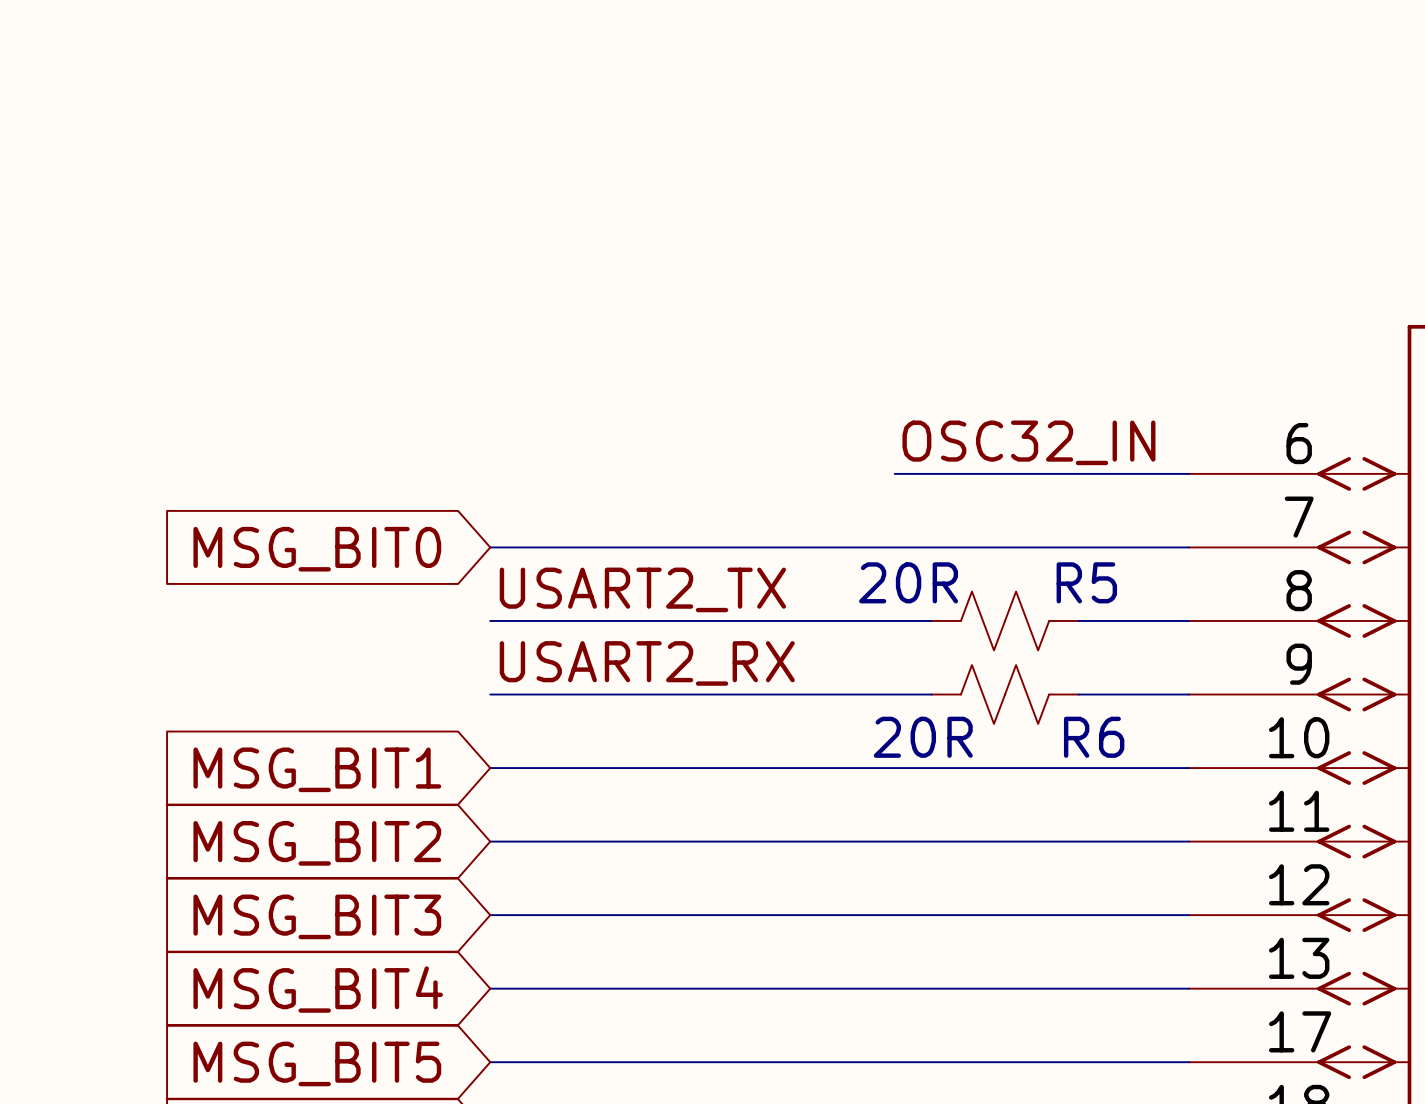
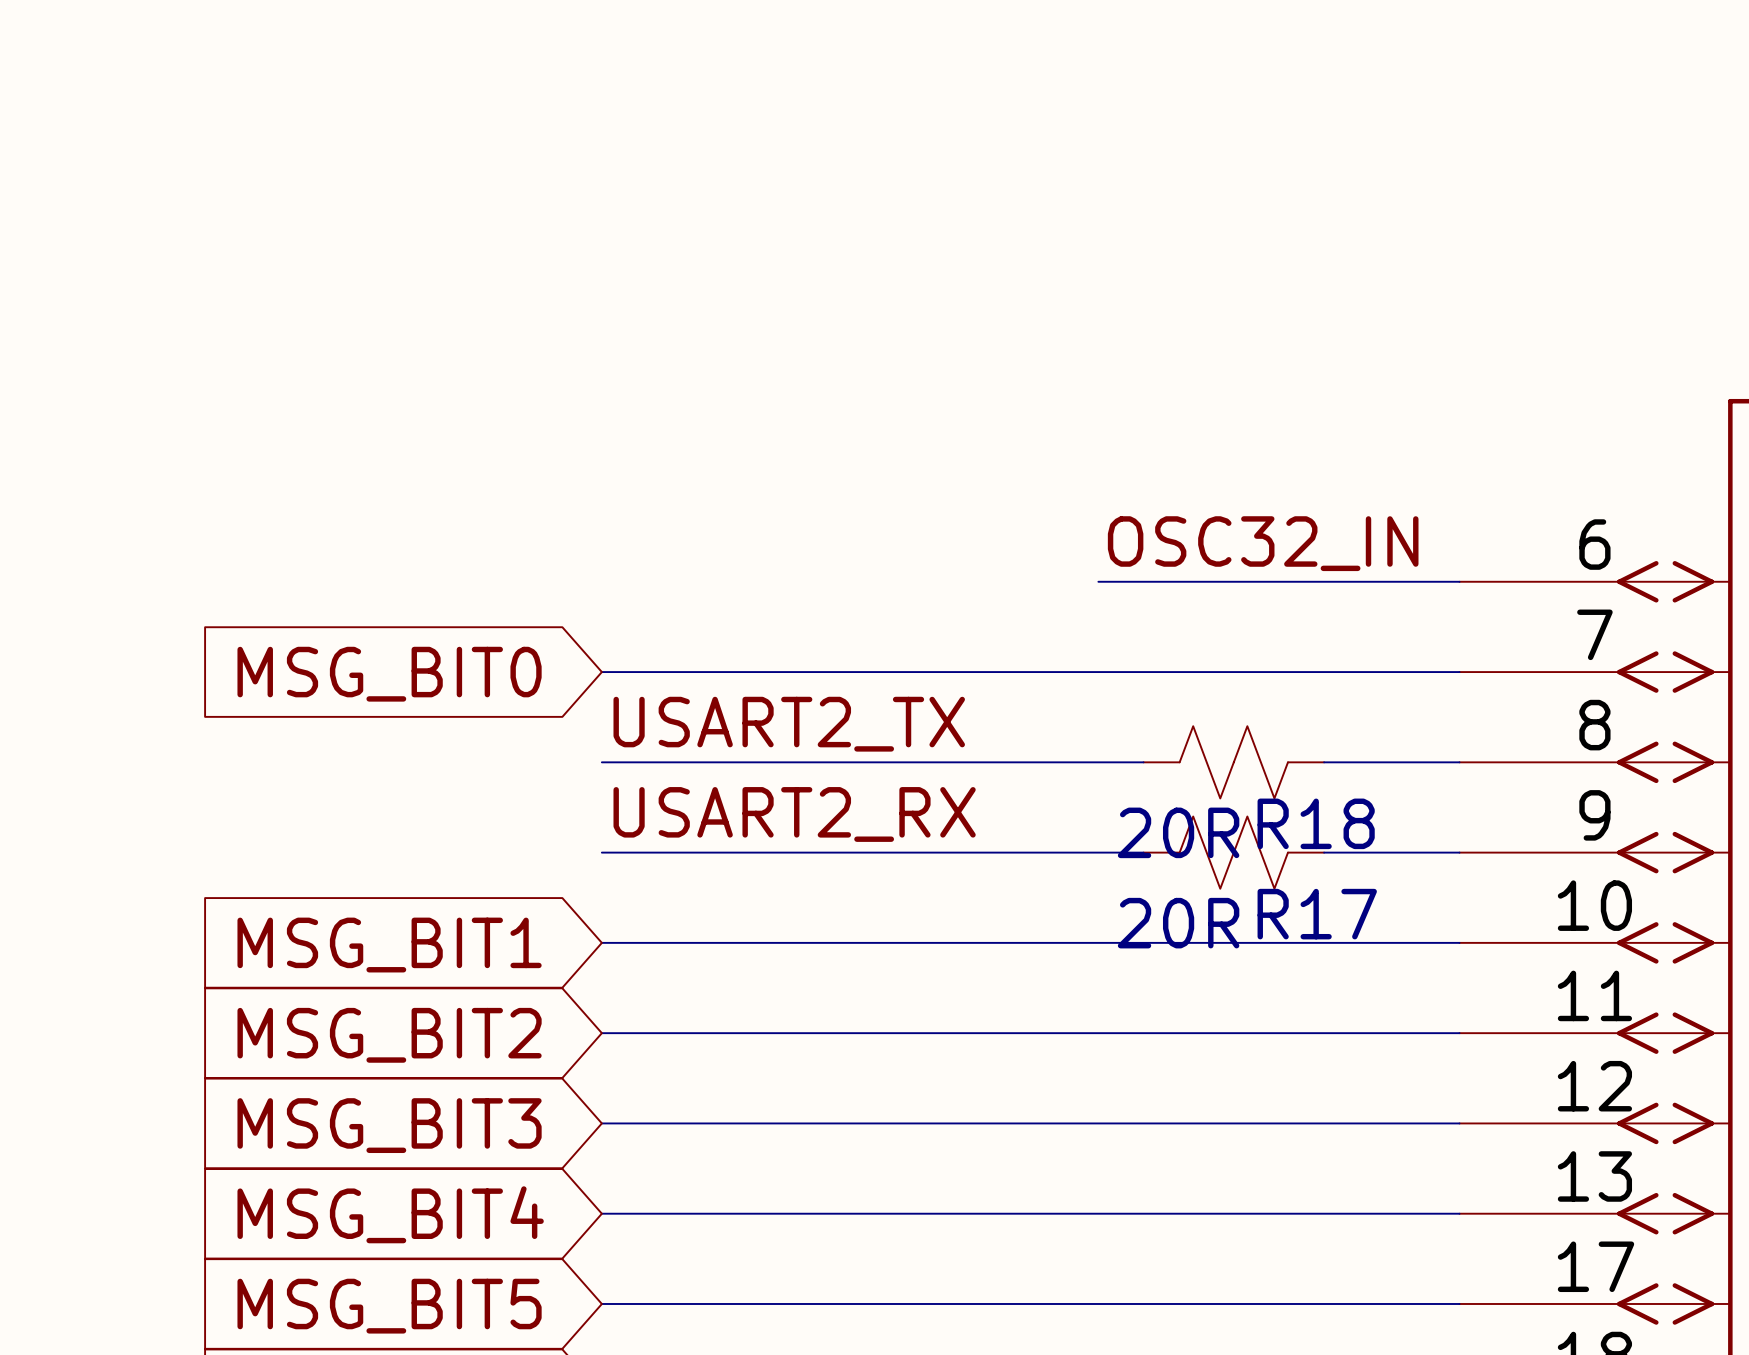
R5 value position: 20R (908, 582) -> 20R (1178, 832)
R5 name: R5 (1086, 582) -> R18 (1316, 823)
R6 value position: 20R (923, 737) -> 20R (1178, 923)
R6 name: R6 (1094, 737) -> R17 (1317, 914)

